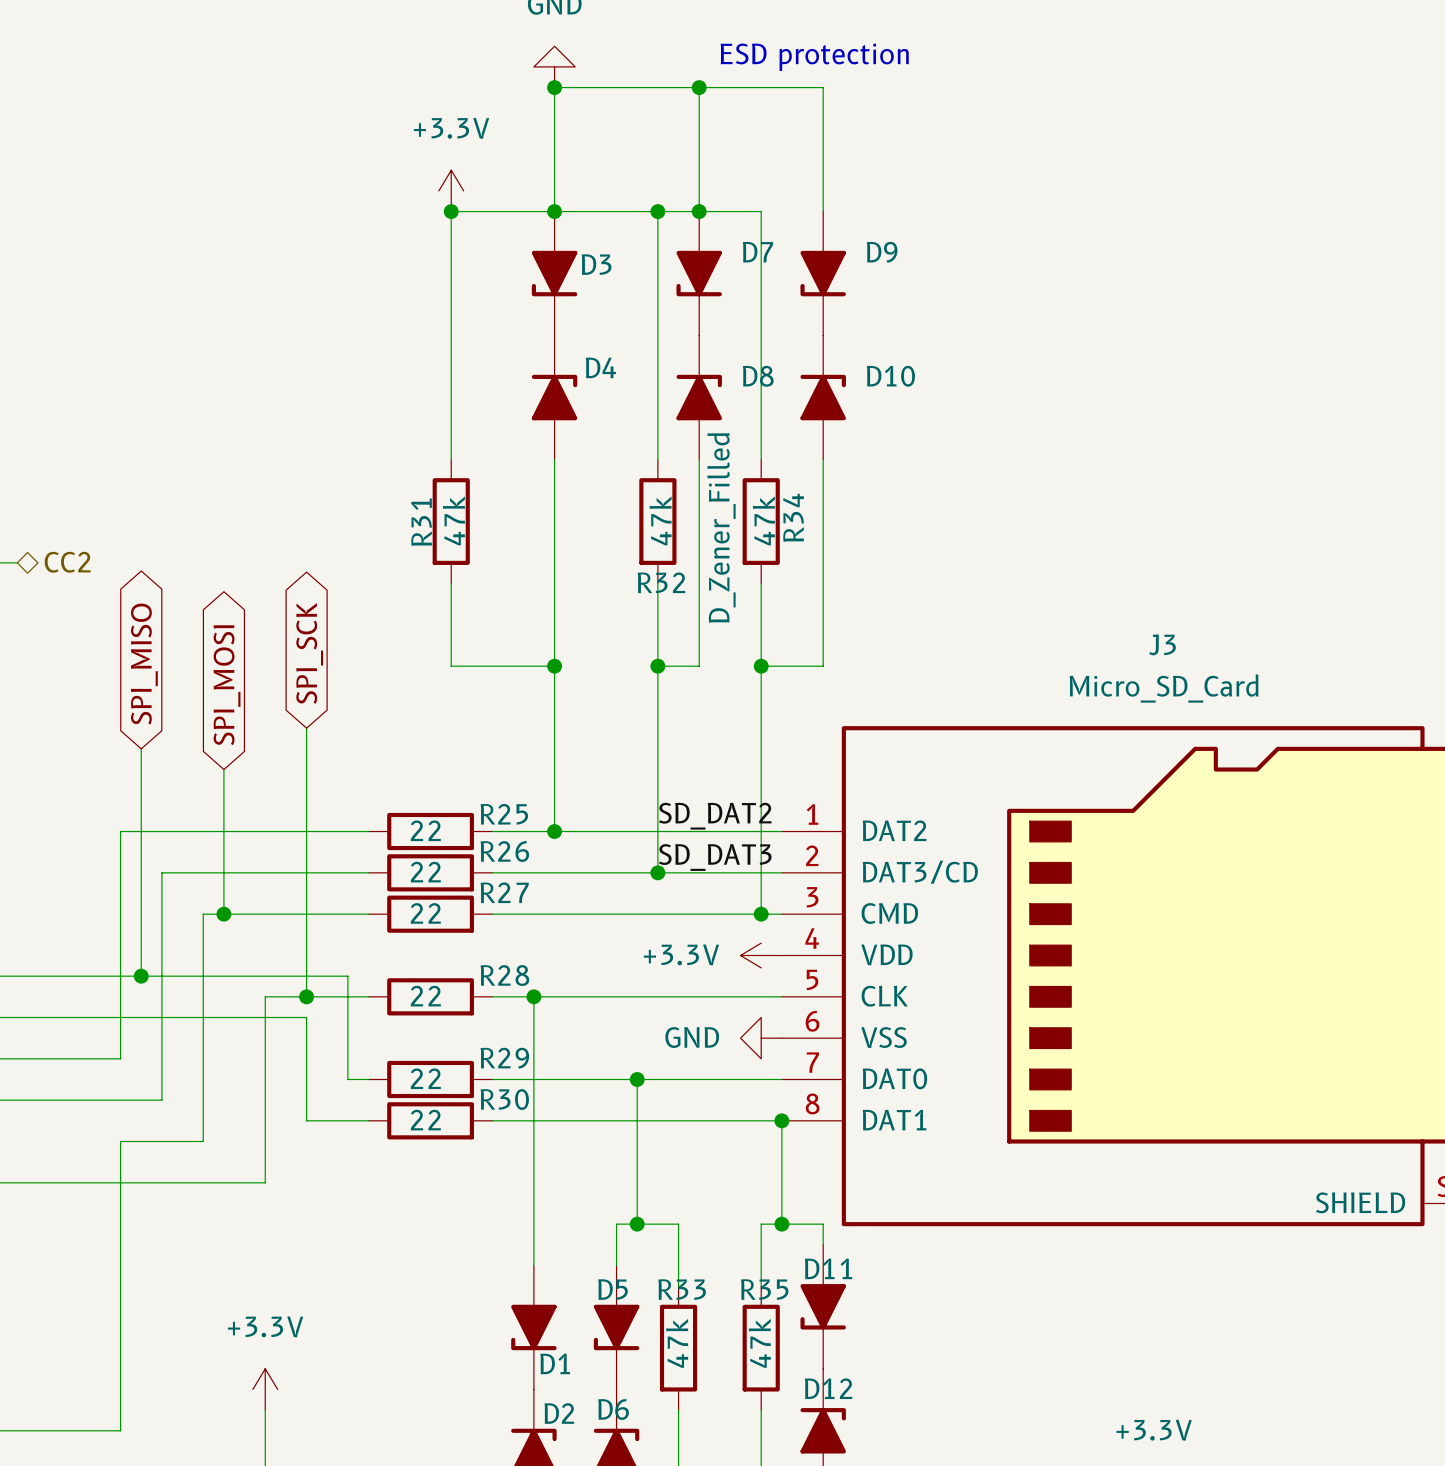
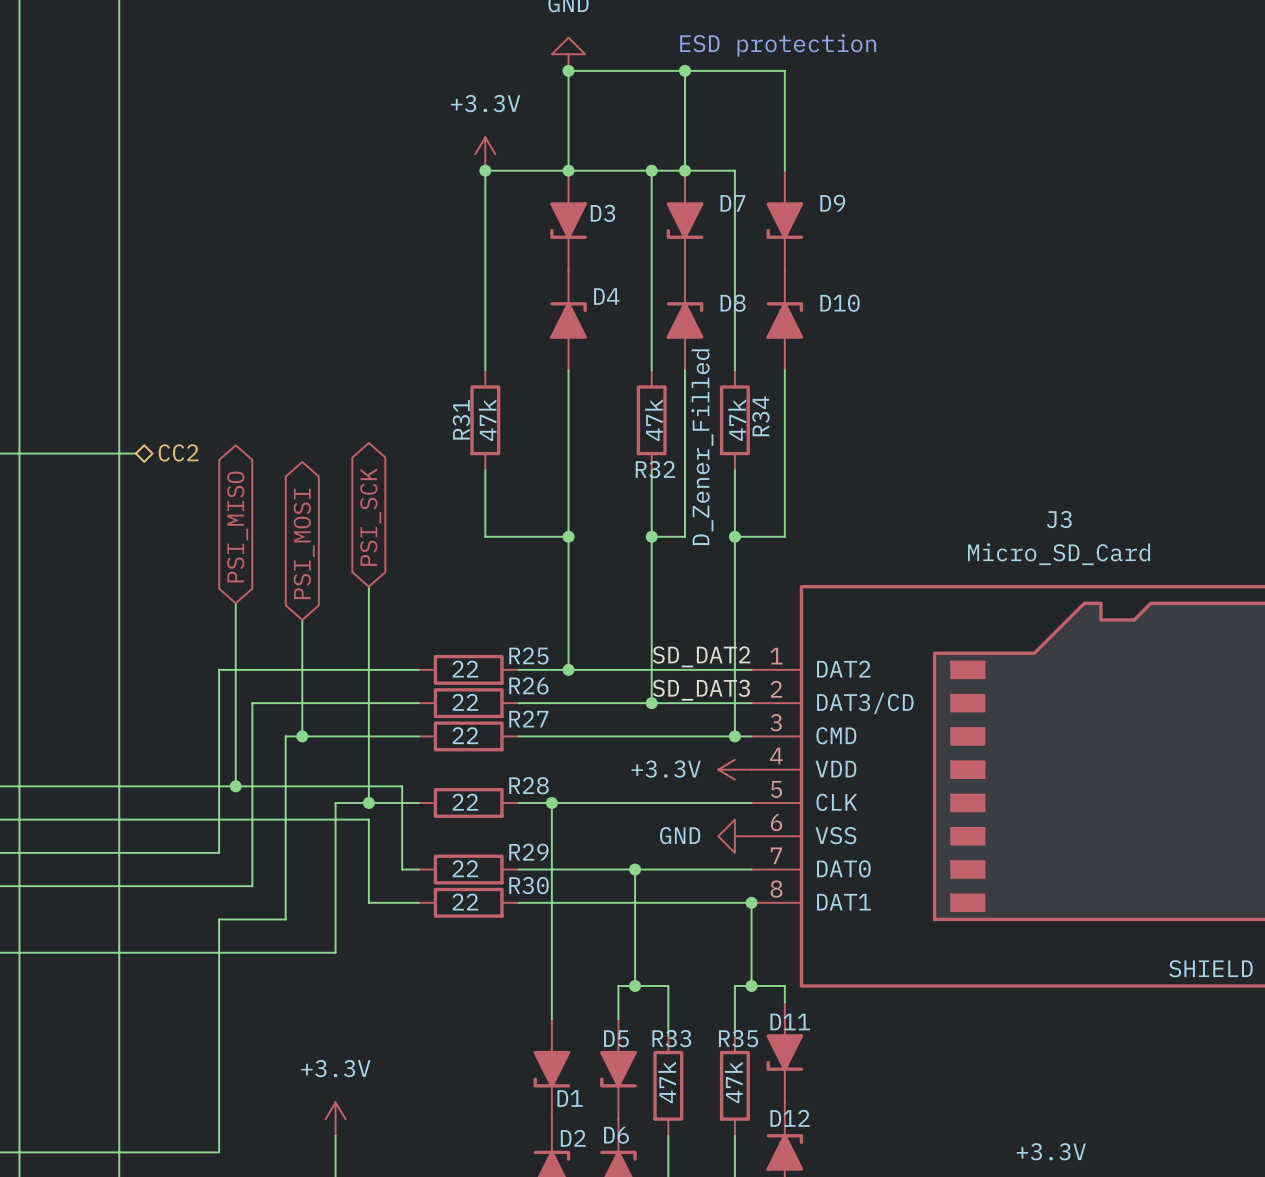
global label: SPI_SCK (309, 653) -> PSI_SCK (370, 517)
global label: SPI_MISO (144, 664) -> PSI_MISO (237, 526)
global label: SPI_MOSI (227, 685) -> PSI_MOSI (304, 543)

